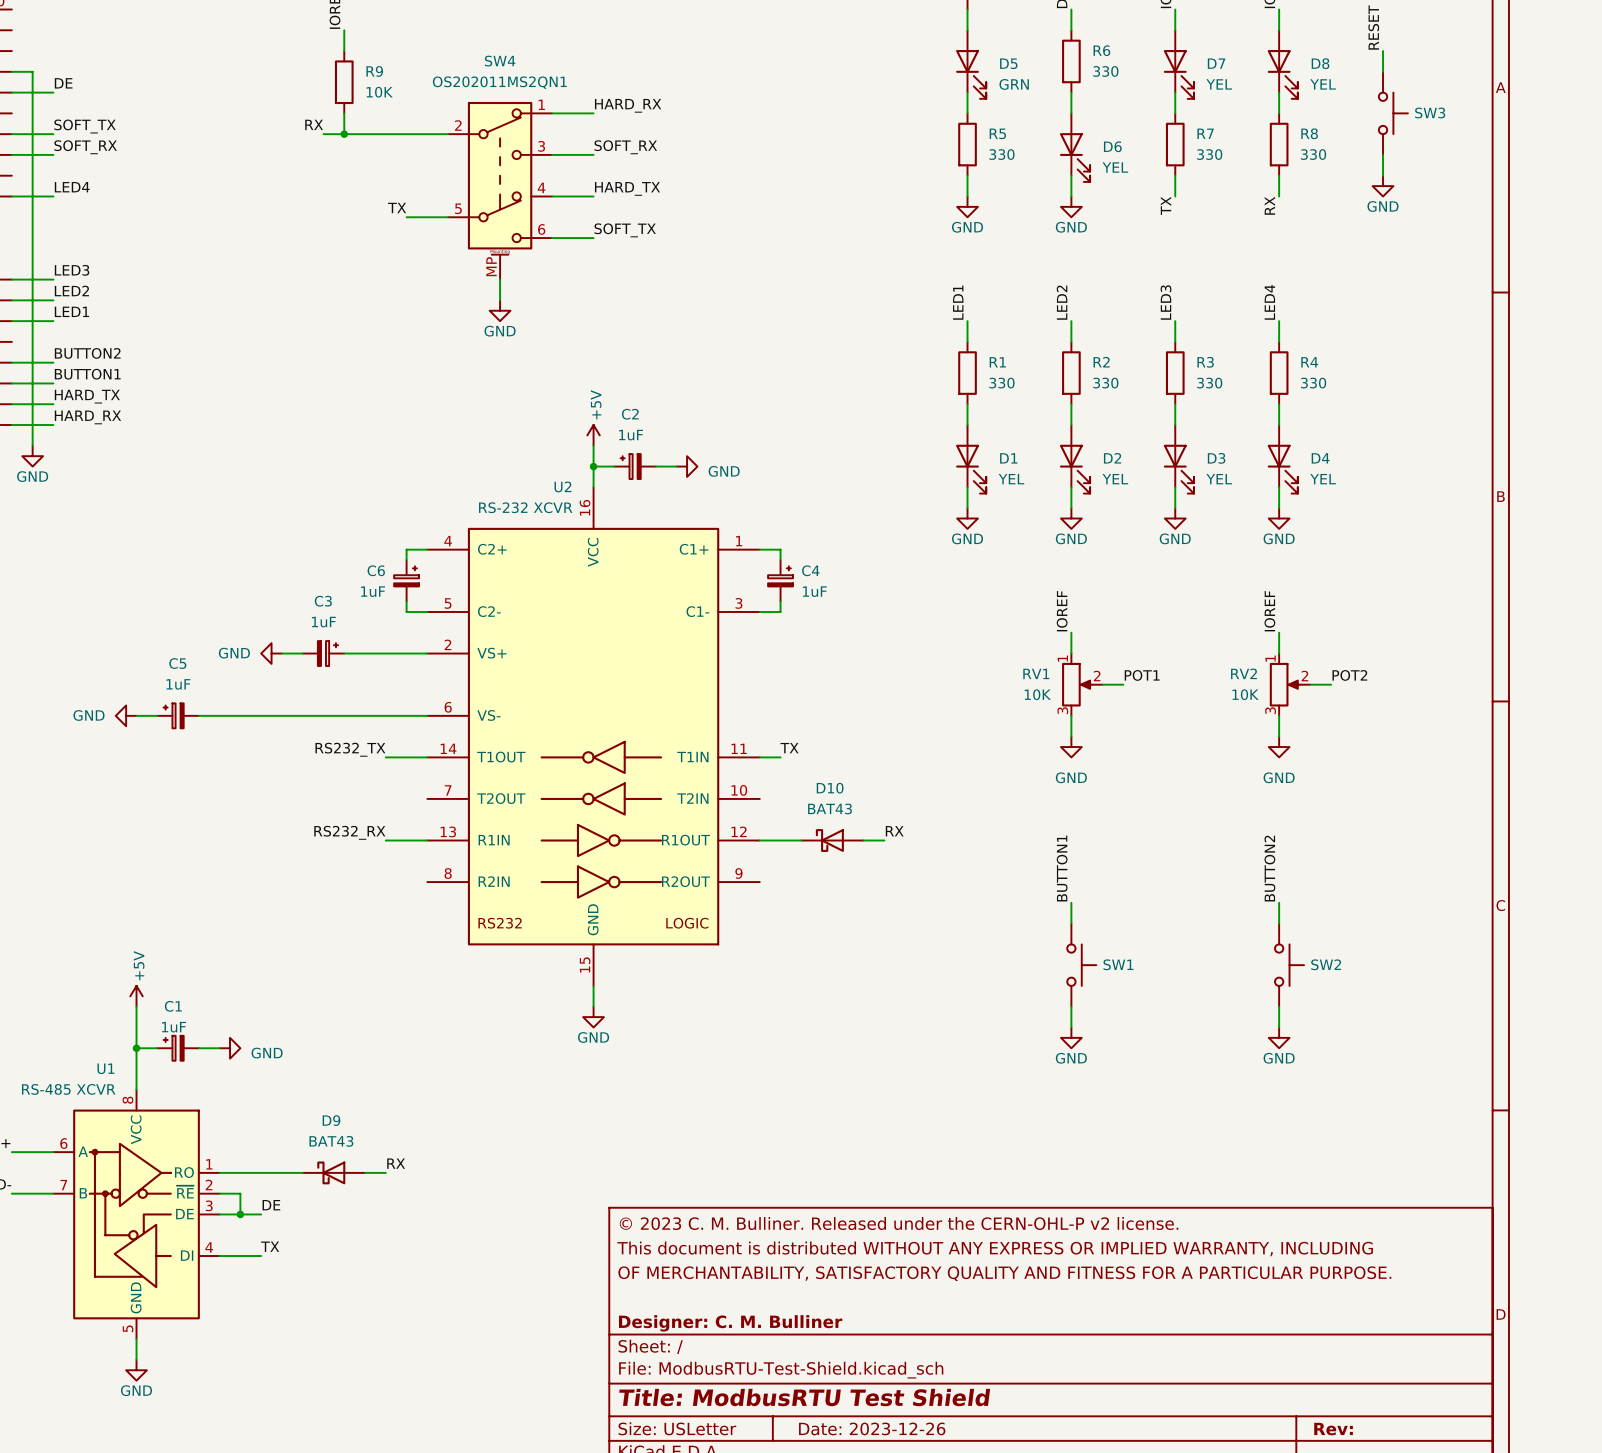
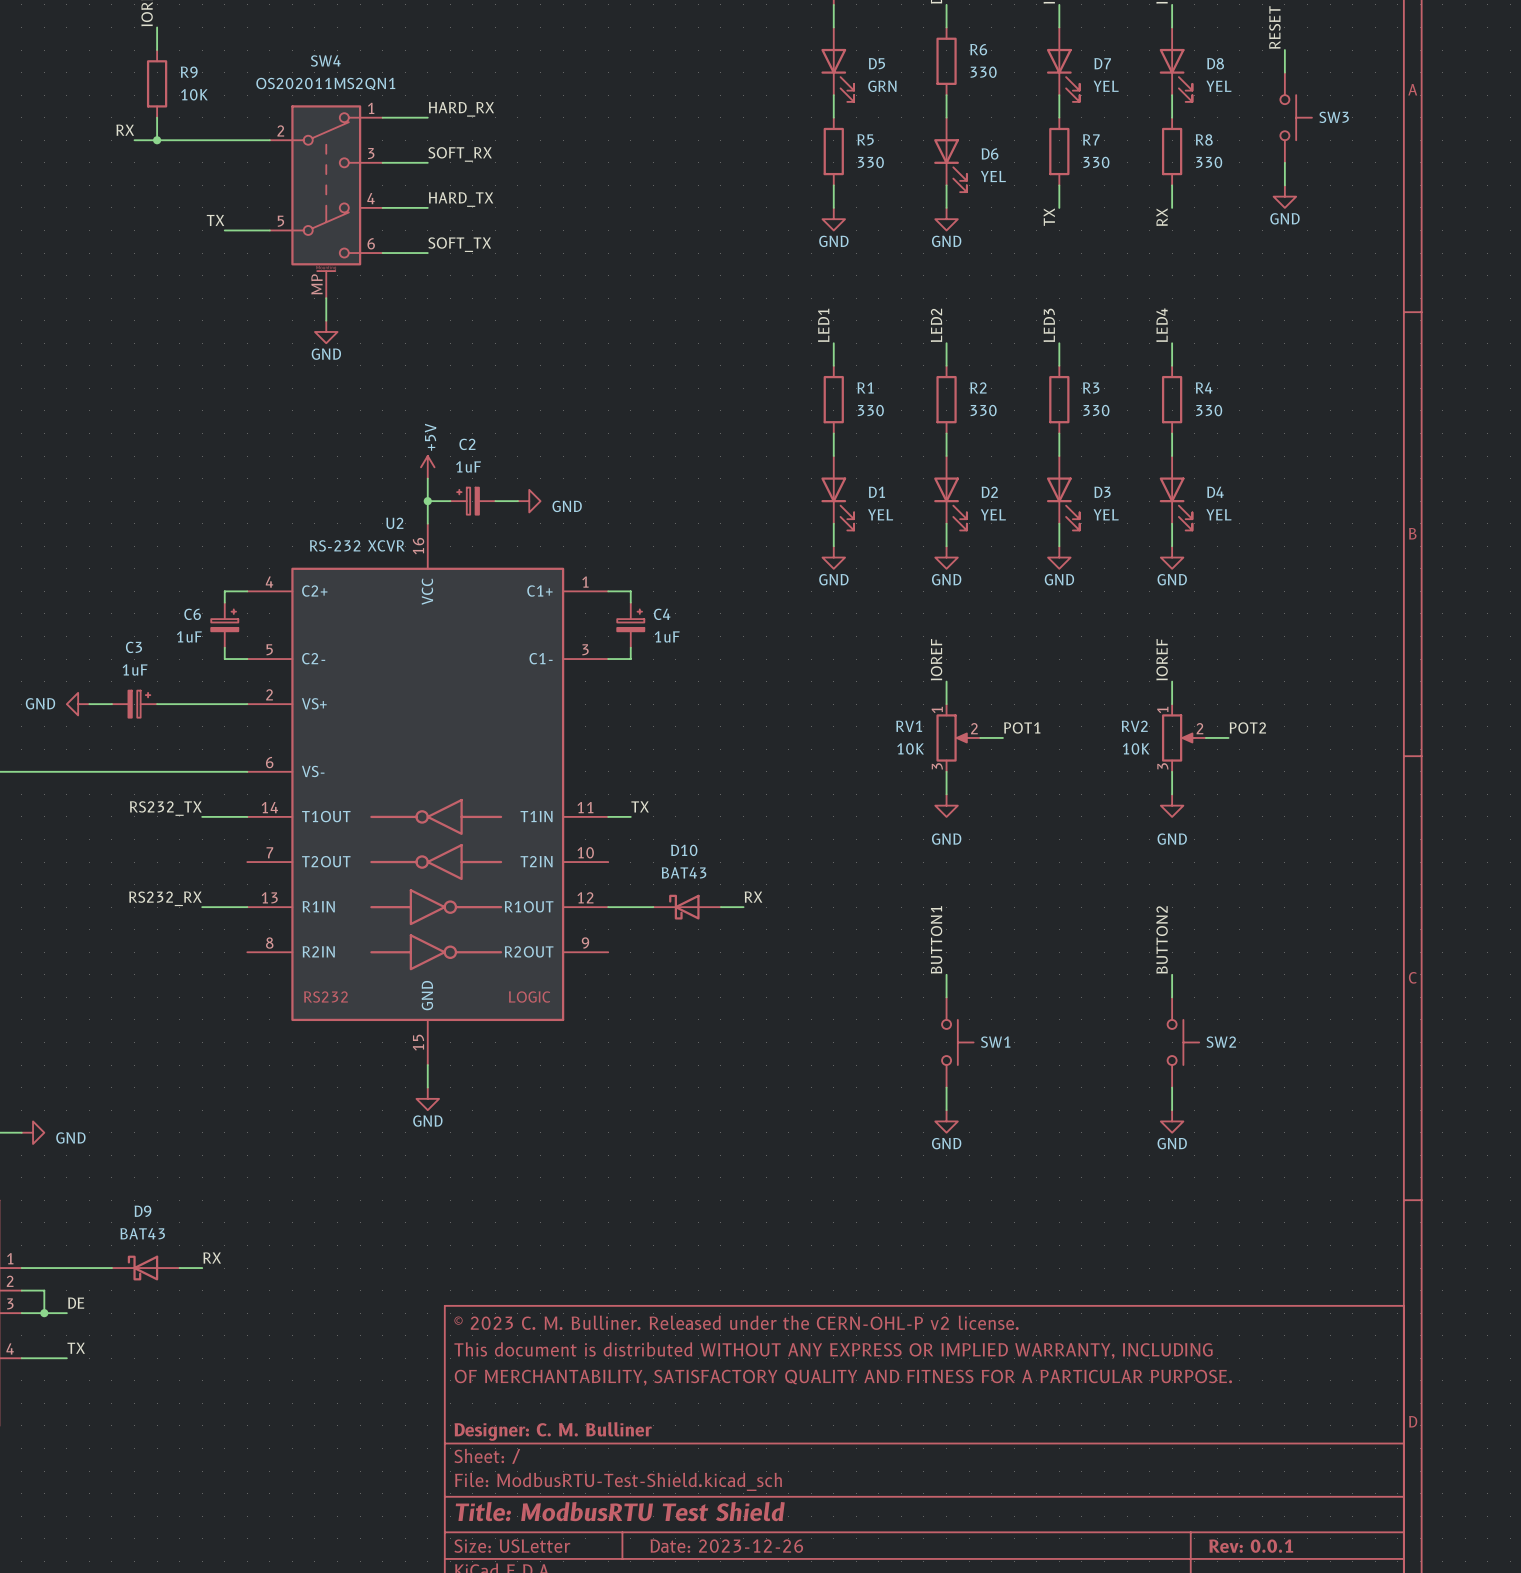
title block: Rev: (1333, 1429) -> Rev: 0.0.1 (1251, 1546)

